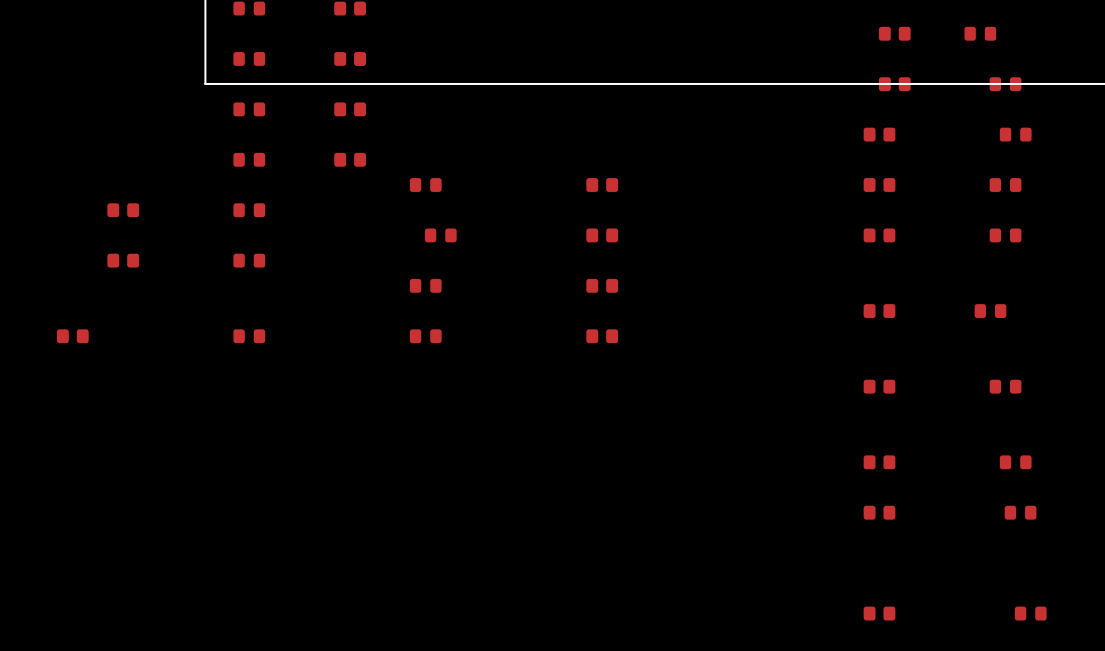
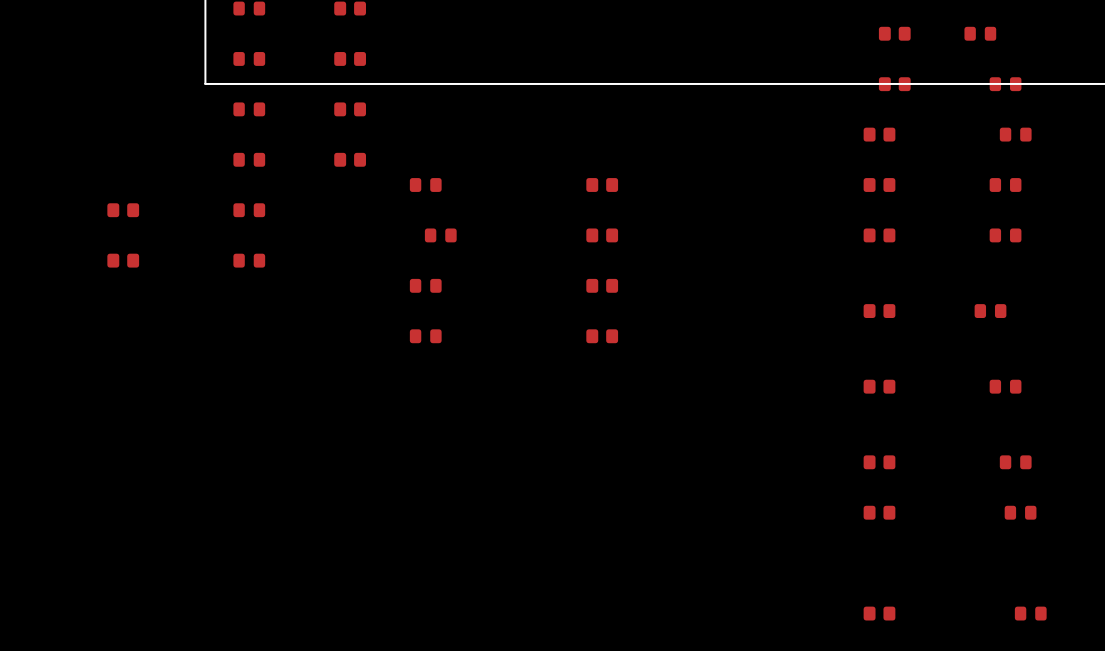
part: (72, 336) -> none
part: (249, 336) -> none

